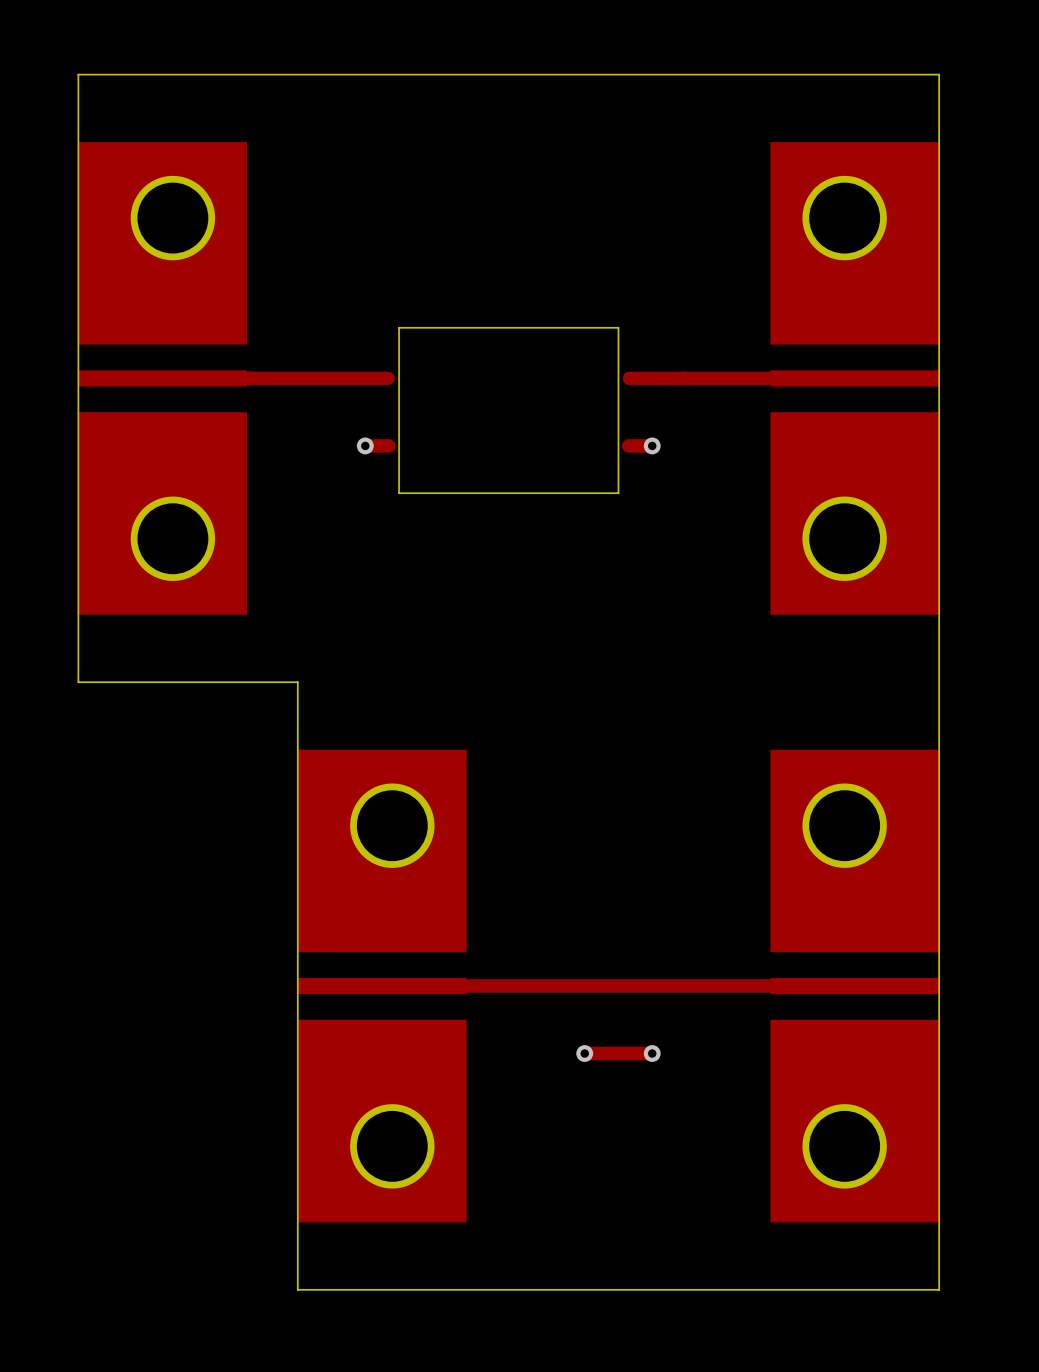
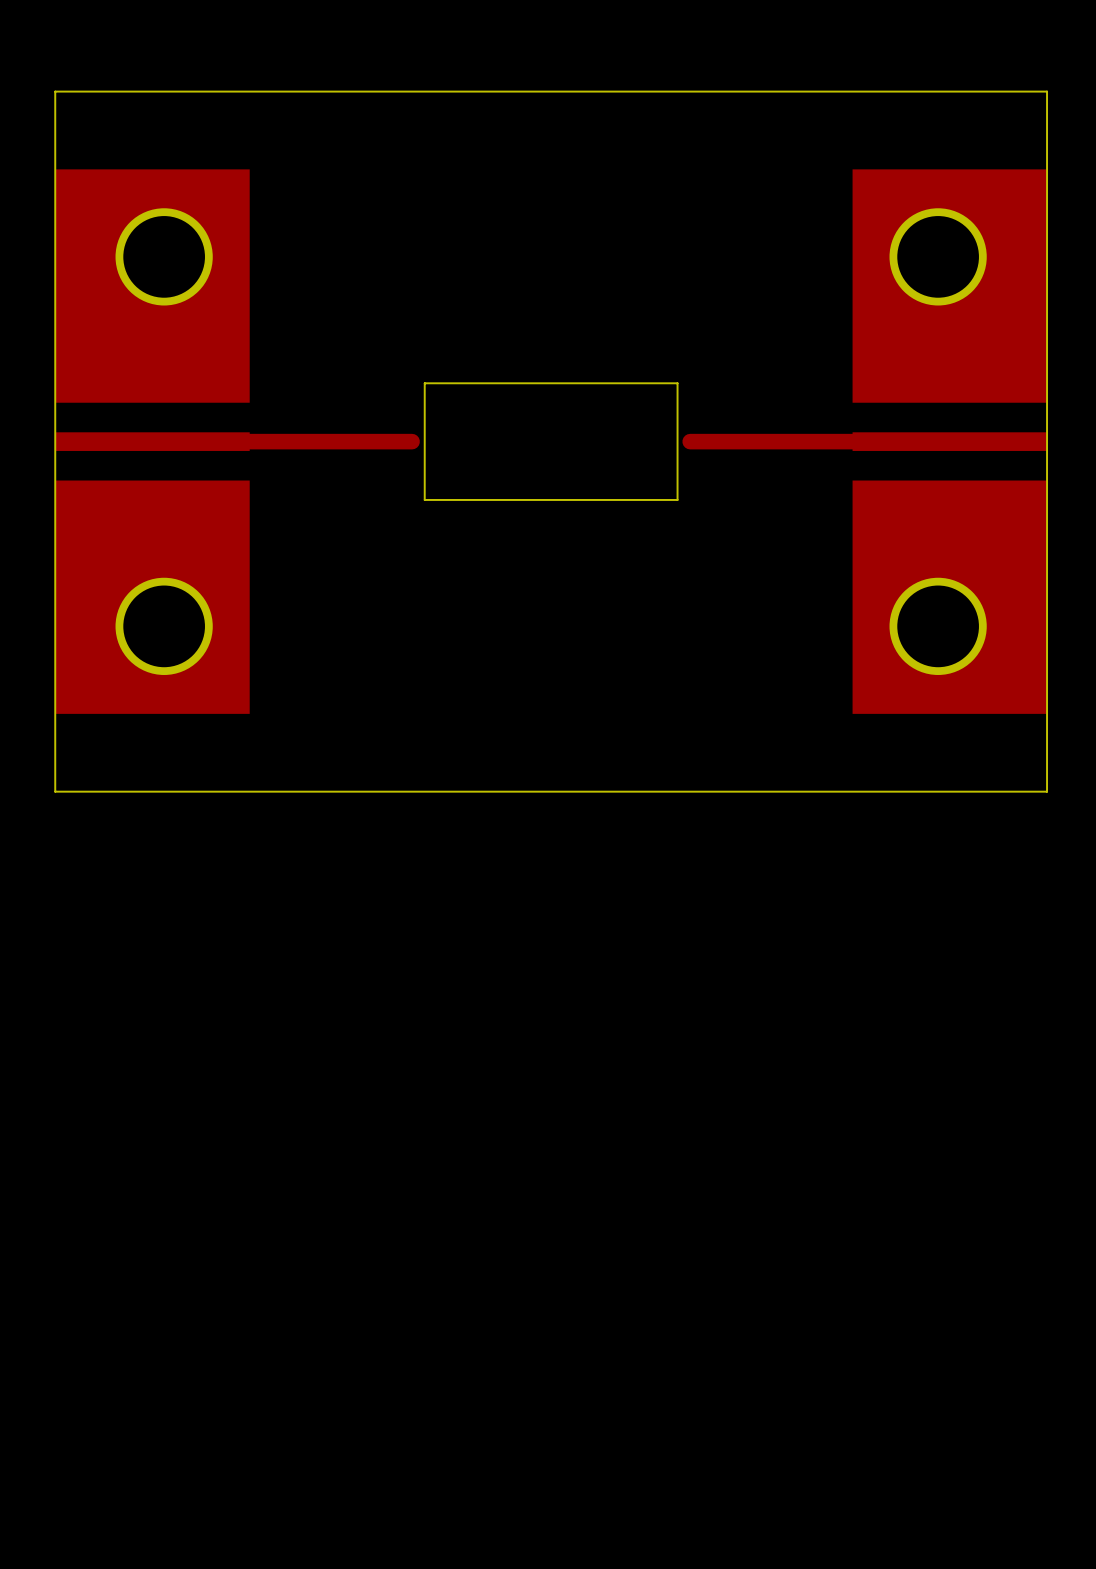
board edge: (618, 429) (618, 493) (399, 493) (399, 429) -> (677, 499) (424, 499)
via: (365, 445) -> none
top track: (388, 445) (365, 445) -> none
top track: (652, 445) (628, 445) -> none
via: (652, 445) -> none
board edge: (939, 682) (939, 1289) (297, 1289) (297, 682) -> (1047, 791) (308, 791)
part: (382, 986) -> none
top track: (854, 986) (382, 986) -> none
part: (854, 986) -> none
via: (584, 1053) -> none
top track: (652, 1053) (584, 1053) -> none
via: (652, 1053) -> none

